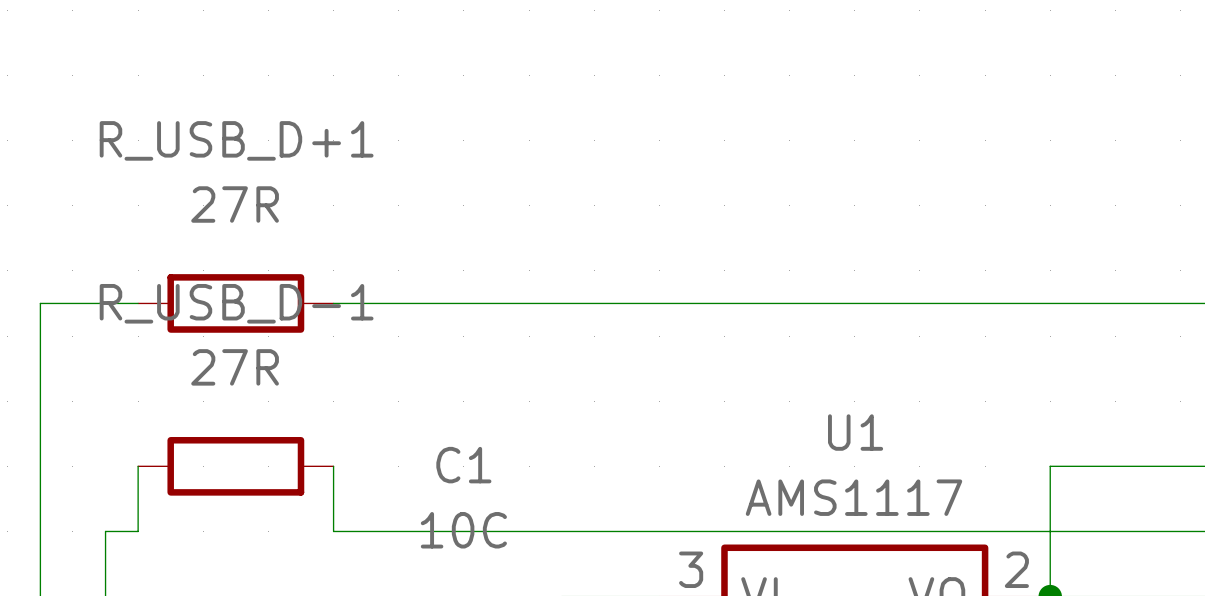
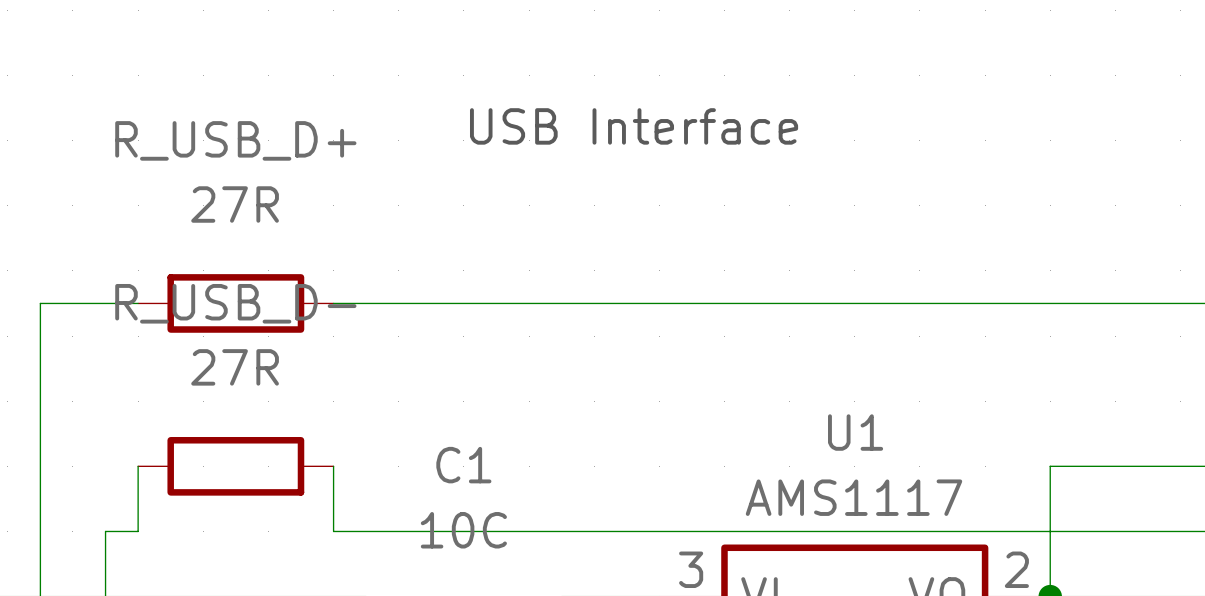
text: none -> USB Interface (634, 126)
R_USB_D+1 name: R_USB_D+1 (236, 140) -> R_USB_D+ (235, 140)
R_USB_D-1 name: R_USB_D-1 (236, 303) -> R_USB_D- (235, 303)

